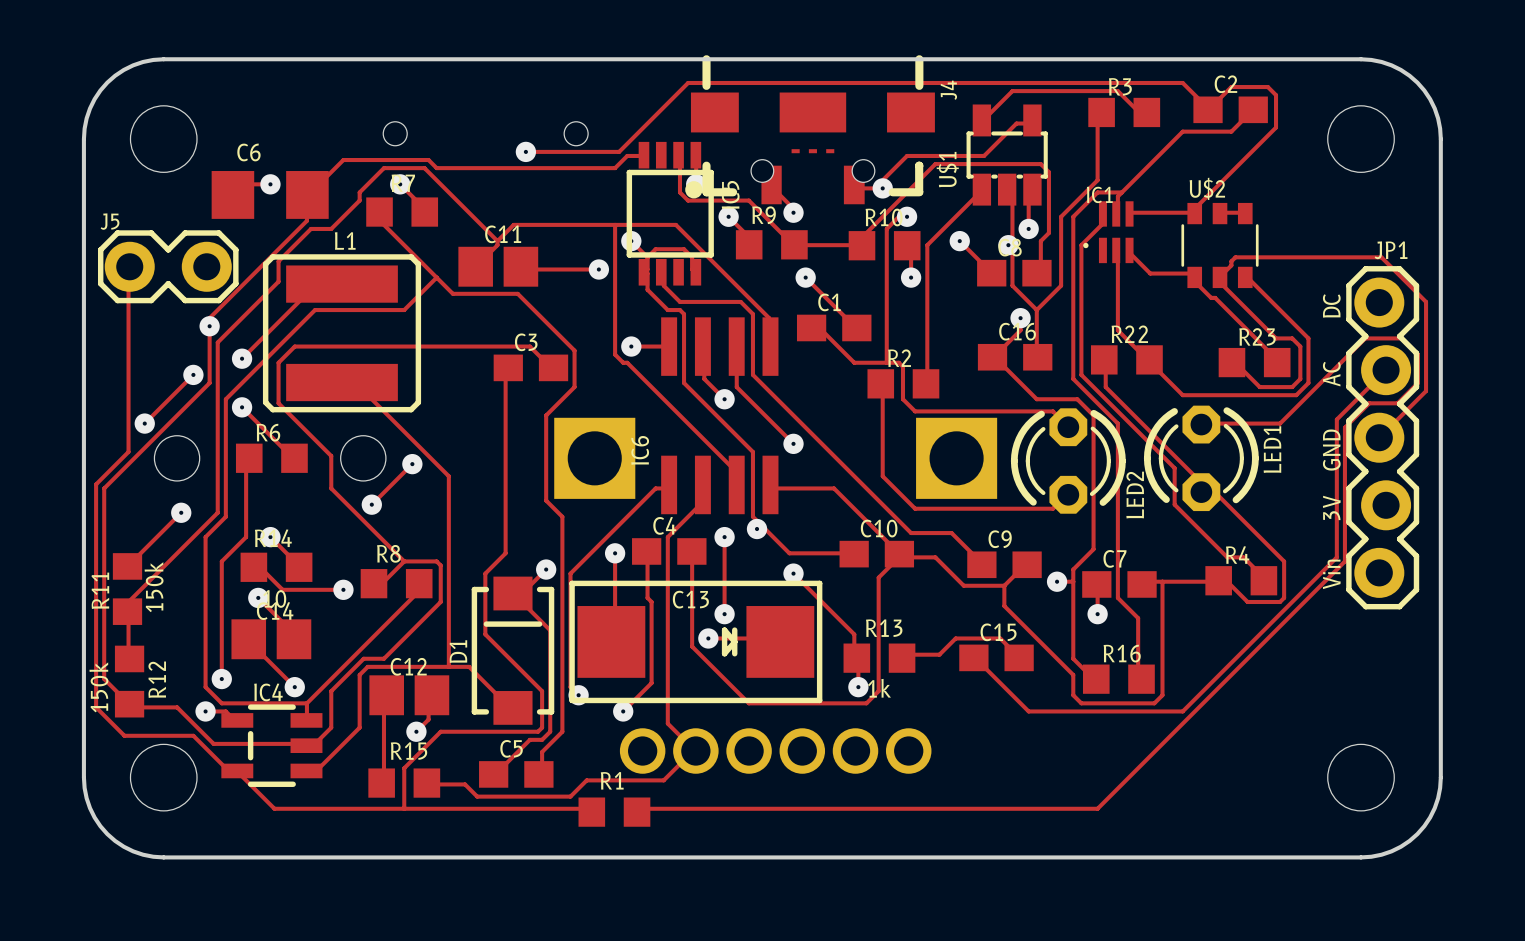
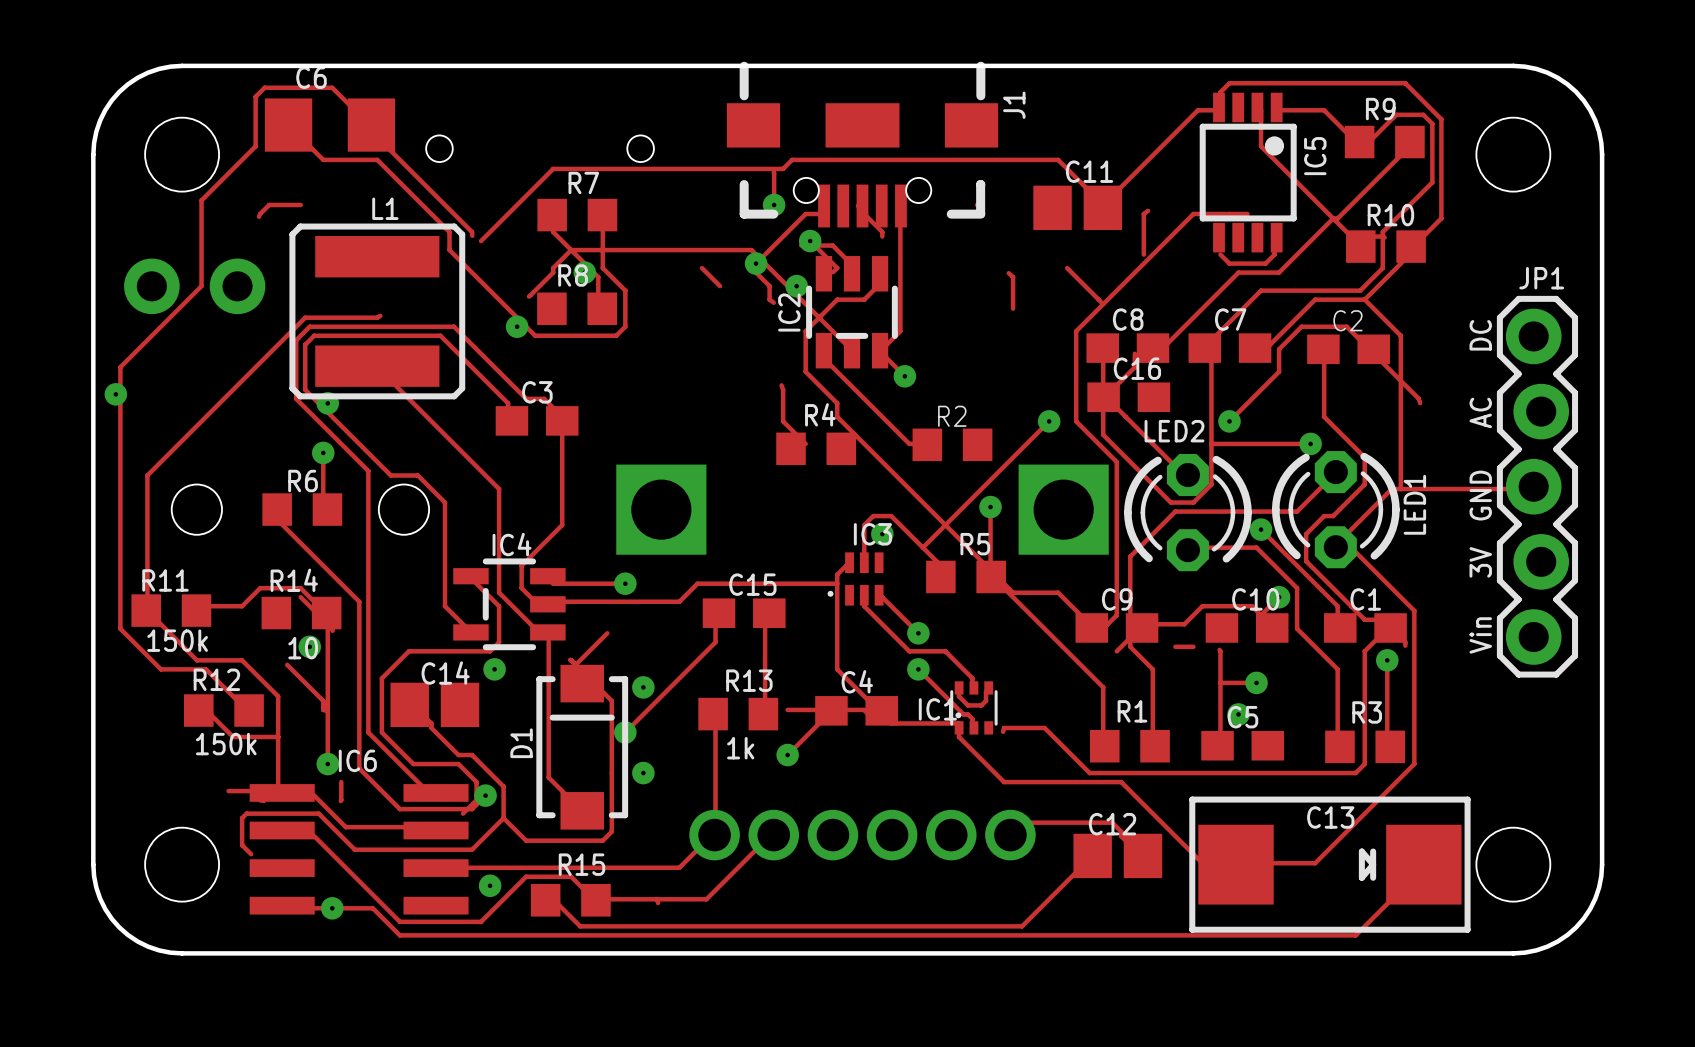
R3 name position: R3 (1120, 86) -> R3 (1367, 712)
track: none -> (1257, 107) (1261, 110) (1261, 146) (1360, 246)
track: none -> (1276, 107) (1279, 110) (1324, 110) (1355, 141) (1369, 141) (1396, 114) (1423, 114) (1432, 123) (1432, 182) (1382, 232) (1382, 268) (1360, 290) (1261, 290) (1206, 344) (1204, 348) (1211, 353) (1211, 484) (1193, 502) (1170, 502) (1103, 434) (1102, 348)
C2 position: (1230, 109) -> (1348, 349)
track: (1253, 109) (1231, 131) (1182, 131) (1117, 196) (1117, 212) (1116, 213) -> none
track: none -> (288, 125) (323, 159) (377, 159) (449, 232) (449, 250) (535, 335) (616, 335) (625, 326) (625, 290) (602, 268) (602, 215)
track: (1101, 112) (1097, 115) (1097, 180) (1061, 216) (1061, 285) (1036, 310) -> none
R3 position: (1124, 112) -> (1365, 746)
track: (1146, 112) (1138, 111) (1117, 91) (1012, 91) (981, 120) -> none
track: (1032, 120) (1028, 123) (1016, 123) (984, 155) (907, 155) (874, 188) (854, 188) (854, 184) -> none
track: none -> (1409, 142) (1409, 146) (1337, 218) (1333, 218) (1279, 272) (1238, 272) (1166, 344) (1157, 344) (1153, 348)
J4: (812, 129) -> none
J1: none -> (862, 144)
track: none -> (584, 168) (553, 168) (481, 241)
via: (525, 151) -> none
track: (619, 151) (688, 82) (1182, 82) (1208, 109) (1231, 87) (1267, 87) (1276, 95) (1276, 127) (1190, 212) -> (688, 168) (783, 168) (792, 159) (1058, 159) (1103, 204)
track: (643, 155) (627, 155) (615, 168) (436, 168) (428, 160) (343, 160) (307, 194) (306, 220) (209, 318) (209, 383) (104, 488) (104, 679) (132, 707) (177, 707) (213, 743) (302, 743) (306, 745) (310, 743) -> none
track: (678, 155) (679, 192) (688, 200) (748, 200) (793, 245) (861, 245) (854, 245) (935, 164) (1040, 164) (1048, 172) (1048, 233) (1040, 241) (1040, 269) (1036, 273) -> none
U$1: (1007, 155) -> none
via: (270, 184) -> none
track: none -> (444, 204) (368, 128) (371, 125) (332, 87) (264, 87) (255, 96) (255, 146) (201, 200) (201, 286) (120, 367) (120, 628) (160, 669) (206, 669) (249, 710)
via: (400, 184) -> none
track: none -> (1103, 204) (1197, 110) (1215, 110) (1218, 107) (1220, 92) (1229, 83) (1405, 83) (1441, 119) (1441, 218) (1411, 246) (1414, 250) (1369, 295)
track: none -> (900, 206) (900, 331) (880, 350) (904, 376)
via: (882, 188) -> none
track: (981, 189) (927, 245) (926, 383) -> none
track: (1007, 189) (1012, 196) (1012, 285) (1036, 310) -> none
track: (1097, 192) (1073, 216) (1073, 378) (1117, 423) (1117, 597) (1138, 618) (1138, 679) (1141, 679) -> (1220, 214) (1193, 214) (1076, 331) (1076, 421) (1116, 461) (1116, 615) (1103, 627)
track: none -> (552, 215) (553, 232) (598, 277) (598, 308) (602, 308)
C6 position: (270, 194) -> (330, 125)
IC1 footprint: [1083, 201, 1134, 264] -> [950, 681, 998, 735]
track: (379, 212) (379, 220) (452, 293) (517, 293) (574, 350) (574, 387) (546, 415) (546, 500) (562, 516) (562, 731) (542, 752) (542, 772) (538, 774) -> none
R7 position: (402, 212) -> (577, 215)
via: (793, 212) -> none
track: (1190, 212) (1129, 213) -> none
IC5 position: (670, 213) -> (1248, 172)
track: (1102, 213) (1101, 224) (1081, 245) (1081, 374) (1174, 468) (1174, 480) -> (1323, 349) (1324, 416) (1364, 457) (1364, 484) (1333, 516) (1324, 516) (1306, 534)
track: none -> (1276, 237) (1274, 241) (1274, 254) (1265, 263) (1229, 263) (1220, 254)
track: (907, 216) (898, 216) (886, 228) (886, 362) -> none
via: (907, 216) -> none
track: none -> (801, 245) (832, 245) (850, 263) (851, 273)
track: (615, 224) (615, 354) (623, 362) (627, 362) (732, 468) (732, 484) (736, 484) -> none
via: (1028, 228) -> none
via: none -> (756, 263)
track: (497, 241) (424, 168) (383, 168) (359, 192) (359, 200) (331, 228) (310, 228) (278, 261) (278, 281) (274, 285) -> none
via: (631, 241) -> none
via: (959, 241) -> none
R9 position: (771, 244) -> (1384, 142)
via: none -> (584, 272)
R10 position: (884, 245) -> (1385, 246)
via: (1008, 245) -> none
U$2: (1220, 245) -> none
track: (684, 249) (655, 249) (647, 257) (647, 269) (643, 272) (647, 273) (647, 289) (667, 310) (679, 310) (684, 314) (684, 383) (752, 451) (752, 516) (789, 553) (854, 554) -> (760, 277) (756, 272) (756, 263) (805, 214) (819, 214) (823, 209) (824, 206)
track: (1116, 250) (1117, 253) (1117, 330) (1182, 395) (1296, 395) (1308, 383) (1308, 338) (1247, 277) (1245, 277) -> none
track: (1129, 250) (1130, 253) (1150, 273) (1190, 273) (1194, 277) (1190, 277) (1211, 297) (1215, 297) -> (1229, 421) (1279, 371) (1279, 349) (1301, 326) (1346, 326) (1351, 331)
part: none -> (194, 286)
via: none -> (796, 286)
track: (1231, 265) (1231, 261) (1235, 257) (1381, 257) (1426, 301) (1426, 391) (1379, 437) -> (1351, 547) (1342, 538) (1335, 547) (1337, 543) (1391, 489) (1531, 489) (1533, 486)
track: (129, 266) (128, 451) (96, 484) (96, 707) (124, 735) (193, 735) (217, 760) -> (503, 818) (472, 849) (354, 849) (318, 813) (246, 813) (242, 818) (242, 845)
J5: (168, 266) -> none
C11 position: (498, 266) -> (1077, 207)
track: (520, 266) (521, 269) (598, 269) -> none
via: (598, 269) -> none
track: (1227, 269) (1220, 277) (1223, 277) (1223, 285) (1276, 338) (1292, 338) (1300, 346) (1300, 378) (1292, 387) (1259, 387) (1235, 362) (1231, 362) -> none
track: (661, 272) (663, 273) (663, 285) (679, 301) (740, 301) (752, 314) (752, 362) -> (880, 273) (877, 277) (877, 286) (864, 299) (837, 299) (805, 331) (805, 371) (837, 403)
C8 position: (1014, 273) -> (1127, 348)
track: (436, 277) (404, 310) (315, 310) (225, 399) (225, 516) (205, 537) (205, 687) (221, 703) (306, 703) (416, 593) (416, 585) (419, 583) -> none
track: (805, 277) (856, 327) -> none
via: (805, 277) -> none
via: (911, 277) -> none
IC2: none -> (851, 312)
track: (315, 285) (242, 358) -> (350, 317) (305, 317)
via: none -> (517, 326)
track: (1036, 310) (1037, 357) -> none
track: none -> (1255, 348) (1256, 344) (1270, 344) (1315, 299) (1364, 299) (1400, 335) (1400, 489)
track: none -> (823, 350) (828, 353) (828, 362) (909, 443) (927, 444)
via: (1020, 318) -> none
via: (209, 326) -> none
track: (811, 327) (813, 330) (821, 330) (854, 362) (898, 362) (902, 366) (902, 399) (915, 411) (1053, 411) (1068, 427) -> none
C1 position: (834, 327) -> (1365, 627)
L1 position: (342, 333) -> (377, 311)
via: none -> (904, 376)
track: (217, 342) (217, 512) (128, 601) (129, 658) -> (242, 380) (147, 475) (146, 610) (197, 660) (242, 660) (278, 696) (278, 791) (282, 792) (282, 795) (314, 795) (345, 827)
track: (631, 346) (669, 346) -> none
via: (631, 346) -> none
track: (736, 346) (736, 387) (793, 443) -> none
via: none -> (115, 394)
via: (242, 358) -> none
track: (1104, 359) (1105, 387) (1198, 480) (1198, 488) (1201, 492) (1215, 492) -> none
R22: (1126, 359) -> none
via: none -> (327, 403)
R23: (1254, 362) -> none
C3 position: (530, 367) -> (537, 420)
track: (553, 367) (529, 346) (294, 346) (278, 362) (278, 403) (331, 456) -> (562, 420) (562, 416) (544, 398) (526, 398) (454, 326) (309, 326) (296, 340) (296, 398) (368, 470) (368, 507)
track: (1386, 370) (1336, 419) (1336, 557) (1182, 711) (1028, 711) (973, 657) -> none
track: (193, 374) (144, 423) -> none
via: (193, 374) -> none
track: none -> (511, 420) (508, 416) (508, 403) (440, 335) (314, 335) (305, 344) (305, 389) (390, 475) (417, 475) (444, 502) (444, 606) (470, 632)
track: none -> (1049, 421) (922, 547)
via: none -> (1049, 421)
via: none -> (1229, 421)
track: (342, 382) (355, 383) (448, 476) -> (377, 366) (499, 489) (499, 529)
track: (880, 383) (882, 387) (882, 476) (915, 508) (1053, 508) (1068, 494) -> none
R2 position: (903, 383) -> (952, 444)
via: (724, 399) -> none
track: (1036, 399) (1077, 399) (1093, 415) (1093, 549) (1073, 569) (1073, 658) (1093, 679) (1096, 679) -> (1152, 443) (1179, 470) (1183, 472)
track: none -> (1211, 443) (1310, 443)
via: none -> (1310, 443)
track: (242, 407) (290, 456) -> (323, 452) (323, 507)
via: (242, 407) -> none
via: none -> (323, 452)
IC6 rotation: 0° (719, 415) -> 90° clockwise (359, 849)
IC6 position: (719, 415) -> (359, 849)
via: (144, 423) -> none
track: (1201, 424) (1280, 423) (1365, 338) (1401, 338) (1417, 354) (1417, 383) (1397, 403) (1369, 403) (1344, 427) (1344, 561) (1097, 808) (639, 808) (637, 812) -> (1335, 472) (1297, 511) (1175, 511) (1130, 556) (1130, 646) (1152, 669) (1152, 746) (1155, 746)
via: (793, 443) -> none
track: none -> (990, 507) (991, 576) (1103, 687) (1103, 746) (1104, 746)
via: none -> (990, 507)
track: (249, 458) (246, 460) (246, 537) (221, 561) (221, 679) -> (277, 509) (278, 520) (359, 601) (359, 768) (399, 809) (472, 809) (476, 804) (476, 800)
track: (412, 464) (371, 504) -> none
via: (412, 464) -> none
track: (505, 472) (505, 553) (485, 573) (485, 634) (542, 691) (542, 727) (538, 731) (440, 731) (404, 768) (404, 808) -> (562, 525) (521, 565) (521, 588) (535, 601) (544, 601) (547, 604) (548, 601) (679, 601) (697, 583) (837, 583)
track: none -> (1261, 529) (1337, 606) (1337, 624) (1340, 627)
via: none -> (1261, 529)
via: none -> (882, 534)
track: (669, 484) (667, 488) (655, 488) (570, 573) (570, 687) (578, 695) -> none
track: (702, 484) (700, 488) (700, 504) (667, 537) (667, 723) (695, 751) -> none
track: (770, 484) (773, 488) (834, 488) (899, 554) -> none
track: (331, 488) (404, 561) -> (368, 543) (368, 732) (426, 791) (435, 791) (436, 792)
track: none -> (1183, 547) (1256, 547) (1297, 588) (1297, 628) (1337, 669) (1337, 746) (1339, 746)
LED2 name rotation: 0° (1135, 495) -> 90° clockwise (1174, 431)
LED2 name position: LED2 (1135, 495) -> LED2 (1174, 431)
via: (371, 504) -> none
track: none -> (849, 562) (837, 574) (837, 669) (877, 709) (881, 710) (882, 714) (891, 723) (958, 723) (959, 727)
track: none -> (864, 562) (864, 525) (873, 516) (891, 516) (936, 561) (936, 574) (940, 576)
track: (181, 512) (127, 566) -> none
via: (181, 512) -> none
track: none -> (547, 576) (553, 583) (625, 583)
R5: none -> (966, 576)
IC3: none -> (855, 578)
via: none -> (625, 583)
C4 name: C4 (664, 525) -> C15 (752, 584)
via: (757, 529) -> none
track: (448, 533) (448, 545) -> (470, 576) (499, 606)
track: none -> (499, 592) (535, 628) (544, 628) (548, 633) (548, 777) (582, 810)
track: none -> (864, 595) (864, 606) (909, 651) (945, 651) (972, 678) (973, 687)
track: none -> (879, 595) (918, 633)
via: (270, 537) -> none
track: (724, 537) (724, 614) -> none
via: (724, 537) -> none
track: none -> (1279, 597) (1261, 615) (1272, 627) (1252, 606) (1202, 606) (1184, 624) (1157, 624) (1153, 627)
via: none -> (1279, 597)
track: none -> (716, 607) (715, 642) (625, 732)
track: none -> (766, 607) (765, 709) (763, 714)
track: none -> (196, 610) (197, 606) (242, 606) (260, 588) (300, 588) (326, 613) (327, 773)
track: (1271, 549) (1284, 561) (1284, 597) (1280, 601) (1247, 601) (1227, 581) (1142, 581) (1142, 584) -> (1414, 610) (1414, 764) (1315, 863) (1202, 863) (1121, 782) (1004, 782) (958, 736) (958, 727)
track: (646, 551) (647, 597) (651, 601) (651, 683) (623, 711) -> none
track: (691, 551) (692, 646) (748, 703) (866, 703) (878, 691) (878, 577) (898, 557) (899, 554) -> none
track: (615, 553) (615, 638) (611, 641) -> none
via: (615, 553) -> none
C10 position: (876, 554) -> (1247, 627)
track: (899, 554) (902, 557) (935, 557) (963, 585) (1004, 585) (1004, 606) (1073, 674) (1073, 695) (1081, 703) (1154, 703) (1162, 695) (1162, 581) -> none
R4 name position: R4 (1237, 555) -> R4 (820, 414)
track: (404, 561) (436, 561) (440, 565) (440, 601) (383, 658) (363, 658) (331, 691) (331, 727) (315, 743) -> (436, 830) (435, 827) (350, 827)
track: (404, 561) (383, 581) (375, 581) (373, 583) -> none
track: (253, 567) (254, 569) (262, 569) (282, 589) (343, 589) -> none
R14 position: (276, 567) -> (301, 613)
via: (546, 569) -> none
via: none -> (918, 633)
track: (793, 573) (854, 634) (854, 654) (858, 658) (858, 687) -> none
via: (793, 573) -> none
track: (448, 577) (448, 666) -> (499, 642) (490, 651) (408, 651) (381, 678) (381, 732) (413, 764) (458, 764) (476, 782)
R4 position: (1241, 580) -> (816, 448)
via: (1057, 581) -> none
R8 position: (396, 583) -> (577, 308)
C7 position: (1119, 584) -> (1229, 348)
R11 rotation: 0° (127, 589) -> 90° clockwise (171, 610)
R11 position: (127, 589) -> (171, 610)
via: (343, 589) -> none
track: none -> (1387, 660) (1387, 746) (1390, 746)
via: none -> (1387, 660)
via position: (258, 597) -> (309, 646)
via: none -> (494, 669)
track: none -> (918, 669) (963, 714) (967, 714) (972, 718) (973, 727)
via: none -> (918, 669)
via: (724, 614) -> none
via: (1097, 614) -> none
track: none -> (1256, 682) (1220, 682) (1220, 741) (1217, 745)
via: none -> (1256, 682)
via: none -> (643, 687)
track: none -> (959, 687) (958, 696) (967, 705) (981, 705) (986, 700) (986, 691) (988, 687)
track: none -> (409, 704) (413, 705) (431, 723) (431, 727) (458, 755) (472, 755) (503, 786) (503, 818)
via: (708, 638) -> none
track: none -> (198, 710) (201, 714) (210, 714) (233, 736) (278, 736)
track: (248, 639) (294, 687) -> none
C14 position: (271, 639) -> (434, 704)
track: none -> (831, 710) (787, 755)
C4: none -> (856, 710)
C13 position: (695, 641) -> (1329, 864)
track: none -> (713, 714) (715, 714) (715, 831) (714, 835) (711, 836) (679, 867)
via: none -> (1238, 714)
D1 position: (512, 650) -> (582, 747)
track: (939, 654) (955, 638) (1000, 638) (1019, 657) -> (1044, 727) (1089, 773) (1355, 773) (1364, 764) (1364, 651) (1387, 628) (1390, 627) (1387, 624)
C15: (996, 657) -> none
via: none -> (625, 732)
R13 position: (879, 658) -> (738, 714)
via: (221, 679) -> none
via: none -> (787, 755)
R16: (1118, 679) -> none
R12 rotation: 0° (129, 681) -> 90° clockwise (223, 710)
R12 position: (129, 681) -> (223, 710)
via: (858, 687) -> none
track: (386, 695) (383, 699) (383, 780) (381, 783) -> none
C12 position: (409, 695) -> (1117, 855)
track: (512, 707) (509, 707) (469, 666) (367, 666) (359, 674) (359, 727) (319, 768) (306, 768) (306, 770) -> none
via: (205, 711) -> none
via: (623, 711) -> none
via position: (416, 731) -> (485, 795)
track: (550, 731) (542, 739) (529, 739) (493, 774) -> (611, 813) (611, 831) (602, 840) (526, 840) (503, 818)
IC4 position: (271, 745) -> (509, 604)
track: none -> (1010, 835) (1022, 822) (1112, 822) (1121, 831) (1121, 836) (1142, 855)
track: (225, 768) (233, 768) (237, 770) (274, 808) (538, 808) -> (282, 830) (309, 831) (399, 921) (481, 921) (526, 876) (571, 876) (593, 899) (598, 899)
track: none -> (1092, 855) (1022, 926) (580, 926) (557, 903) (548, 903) (545, 900)
C5 position: (516, 774) -> (1242, 745)
track: none -> (1423, 864) (1423, 867) (1355, 935) (399, 935) (372, 908) (282, 908) (282, 905)
track: (586, 780) (570, 796) (477, 796) (465, 784) (426, 783) -> (652, 867) (436, 868)
track: (611, 780) (663, 780) -> (656, 899) (706, 899) (738, 867)
R15 position: (404, 783) -> (570, 900)
via: none -> (490, 885)
R1 position: (614, 812) -> (1129, 746)
via: none -> (332, 908)

